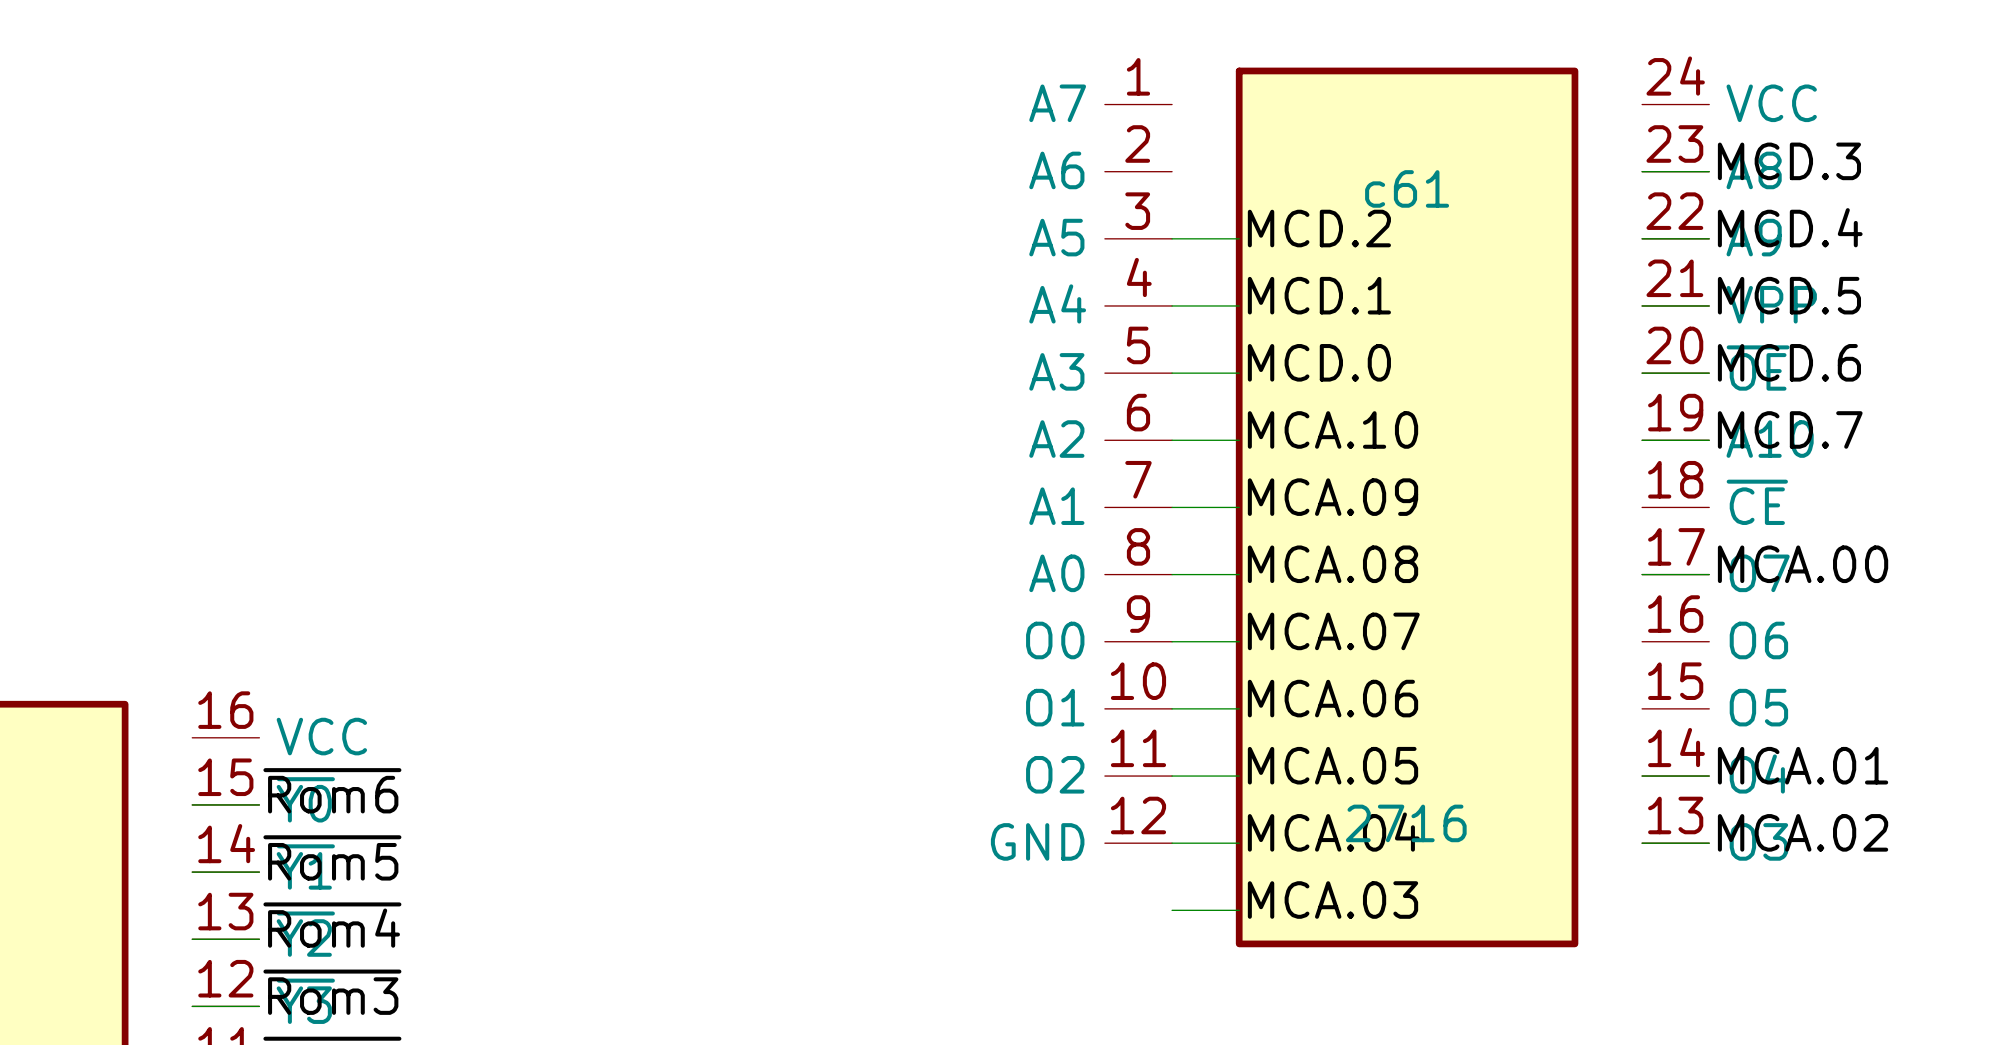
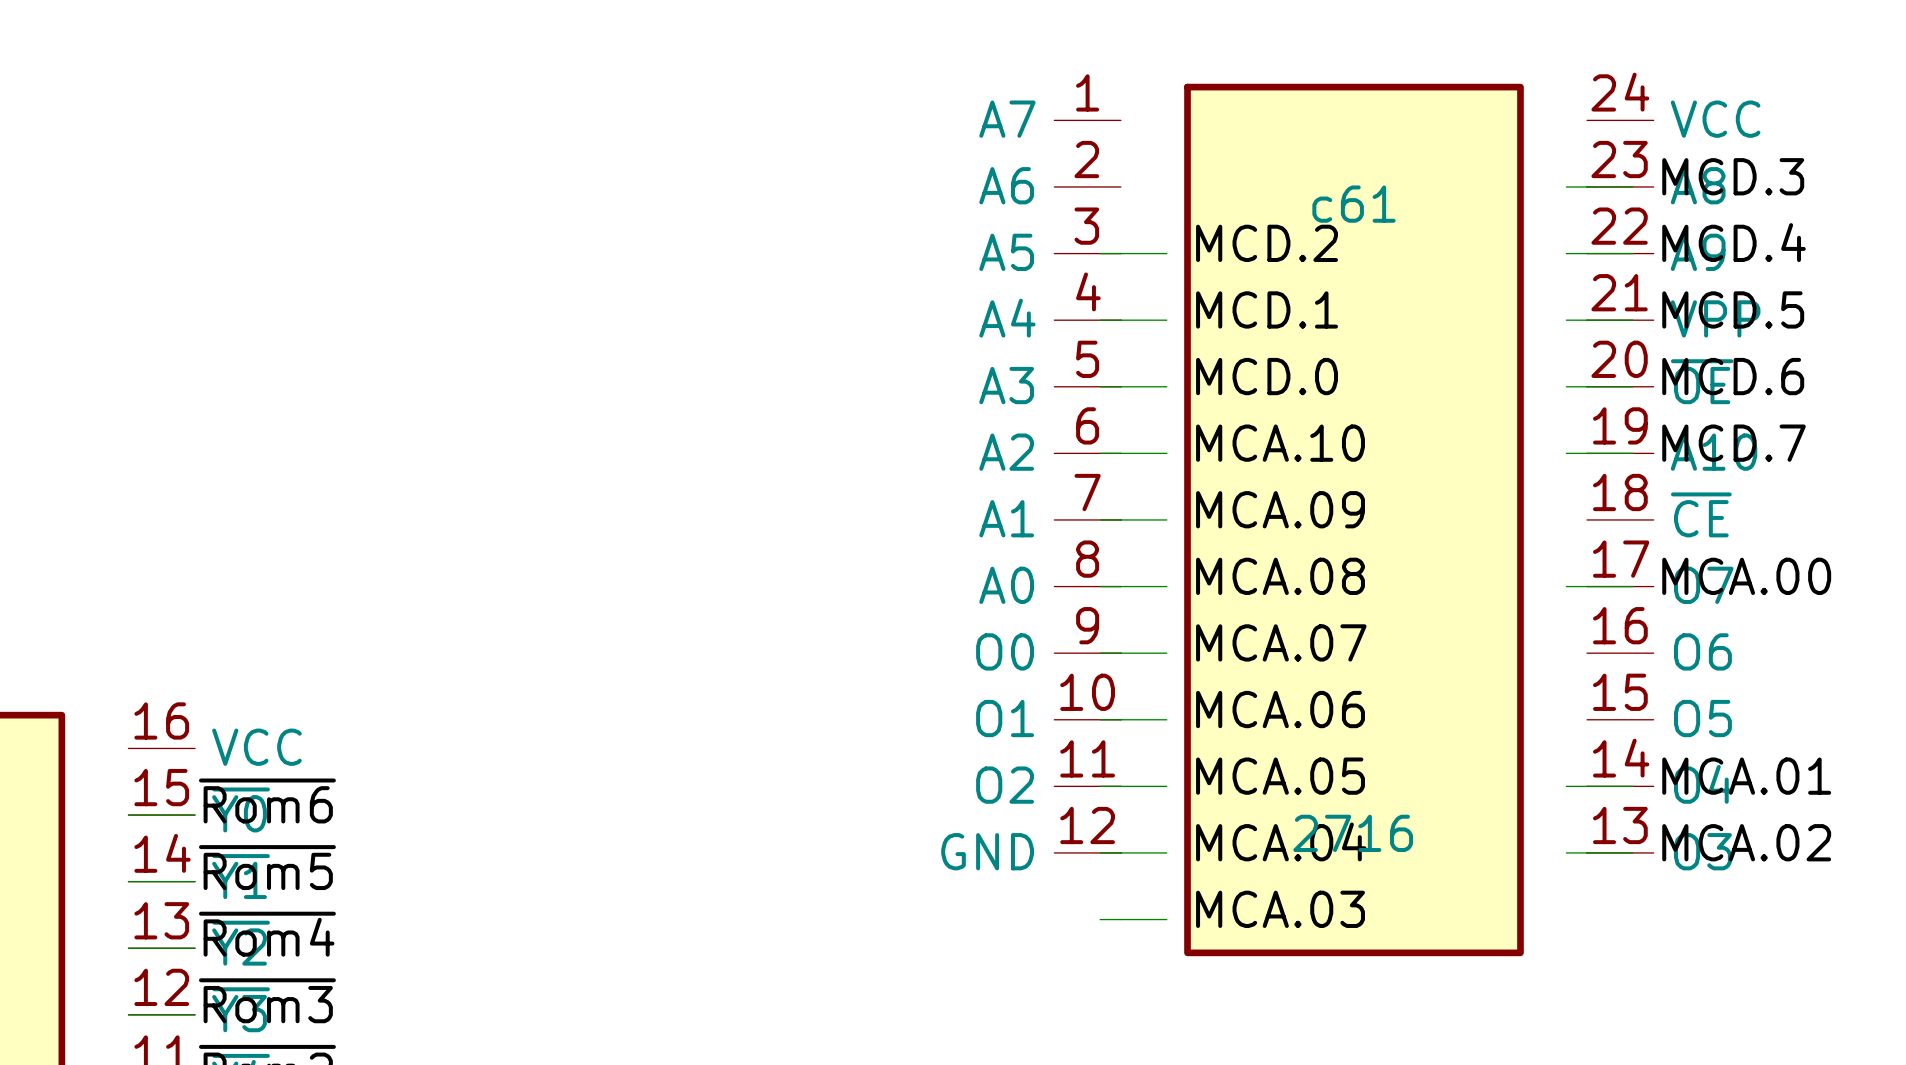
label position: MCD.3 (1789, 161) -> MCD.3 (1733, 176)
label position: MCD.4 (1790, 227) -> MCD.4 (1734, 242)
label position: MCD.2 (1319, 228) -> MCD.2 (1267, 243)
label position: MCD.1 (1319, 295) -> MCD.1 (1267, 309)
label position: MCD.5 (1789, 295) -> MCD.5 (1733, 309)
label position: MCD.0 (1319, 362) -> MCD.0 (1267, 376)
label position: MCD.6 (1789, 362) -> MCD.6 (1733, 376)
label position: MCA.10 (1332, 429) -> MCA.10 (1280, 443)
label position: MCD.7 (1790, 429) -> MCD.7 (1734, 443)
label position: MCA.09 (1332, 497) -> MCA.09 (1280, 509)
c61 position: (1407, 507) -> (1353, 519)
label position: MCA.08 (1332, 564) -> MCA.08 (1280, 576)
label position: MCA.00 (1803, 564) -> MCA.00 (1746, 576)
label position: MCA.07 (1333, 631) -> MCA.07 (1281, 642)
label position: MCA.06 (1332, 698) -> MCA.06 (1280, 709)
label position: MCA.05 (1332, 765) -> MCA.05 (1280, 776)
label position: MCA.01 (1803, 765) -> MCA.01 (1746, 776)
label position: MCA.04 (1333, 832) -> MCA.04 (1281, 841)
label position: MCA.02 (1803, 832) -> MCA.02 (1746, 842)
label position: MCA.03 (1332, 900) -> MCA.03 (1280, 909)

